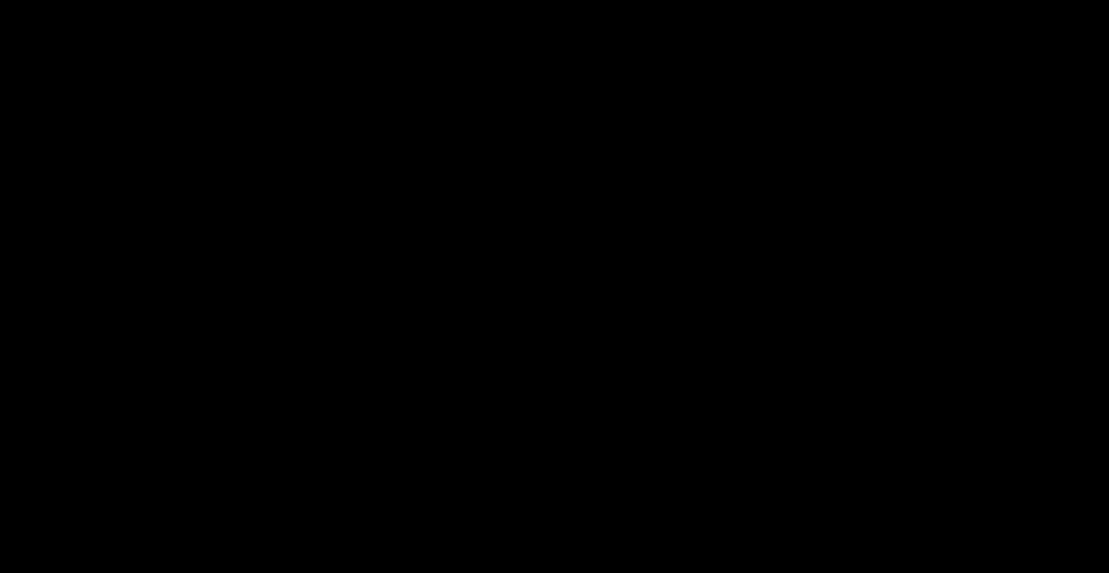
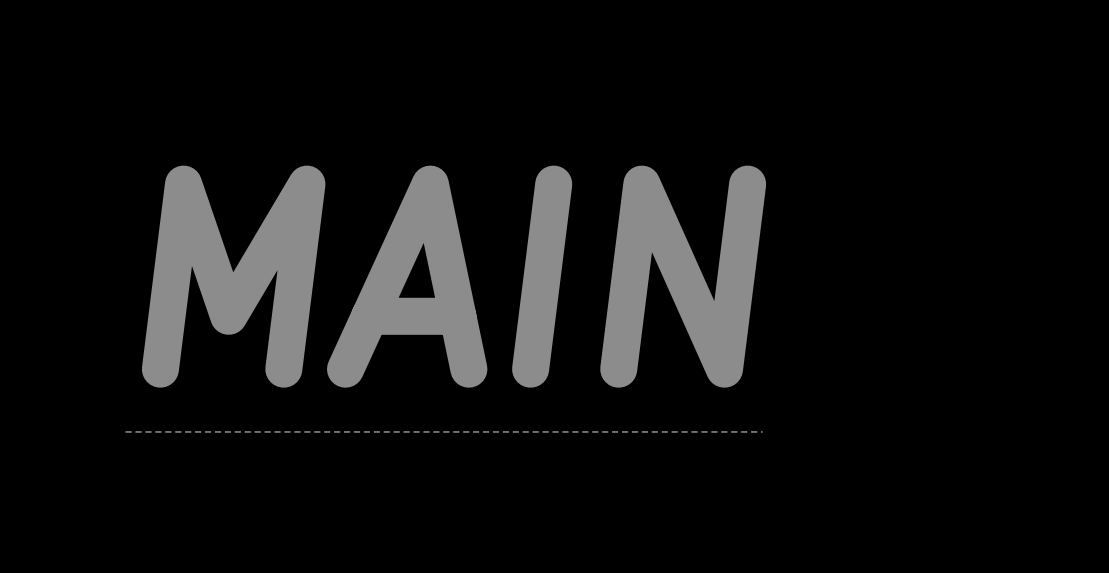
text: none -> MAIN (454, 276)
line: none -> (125, 431) (762, 431)

